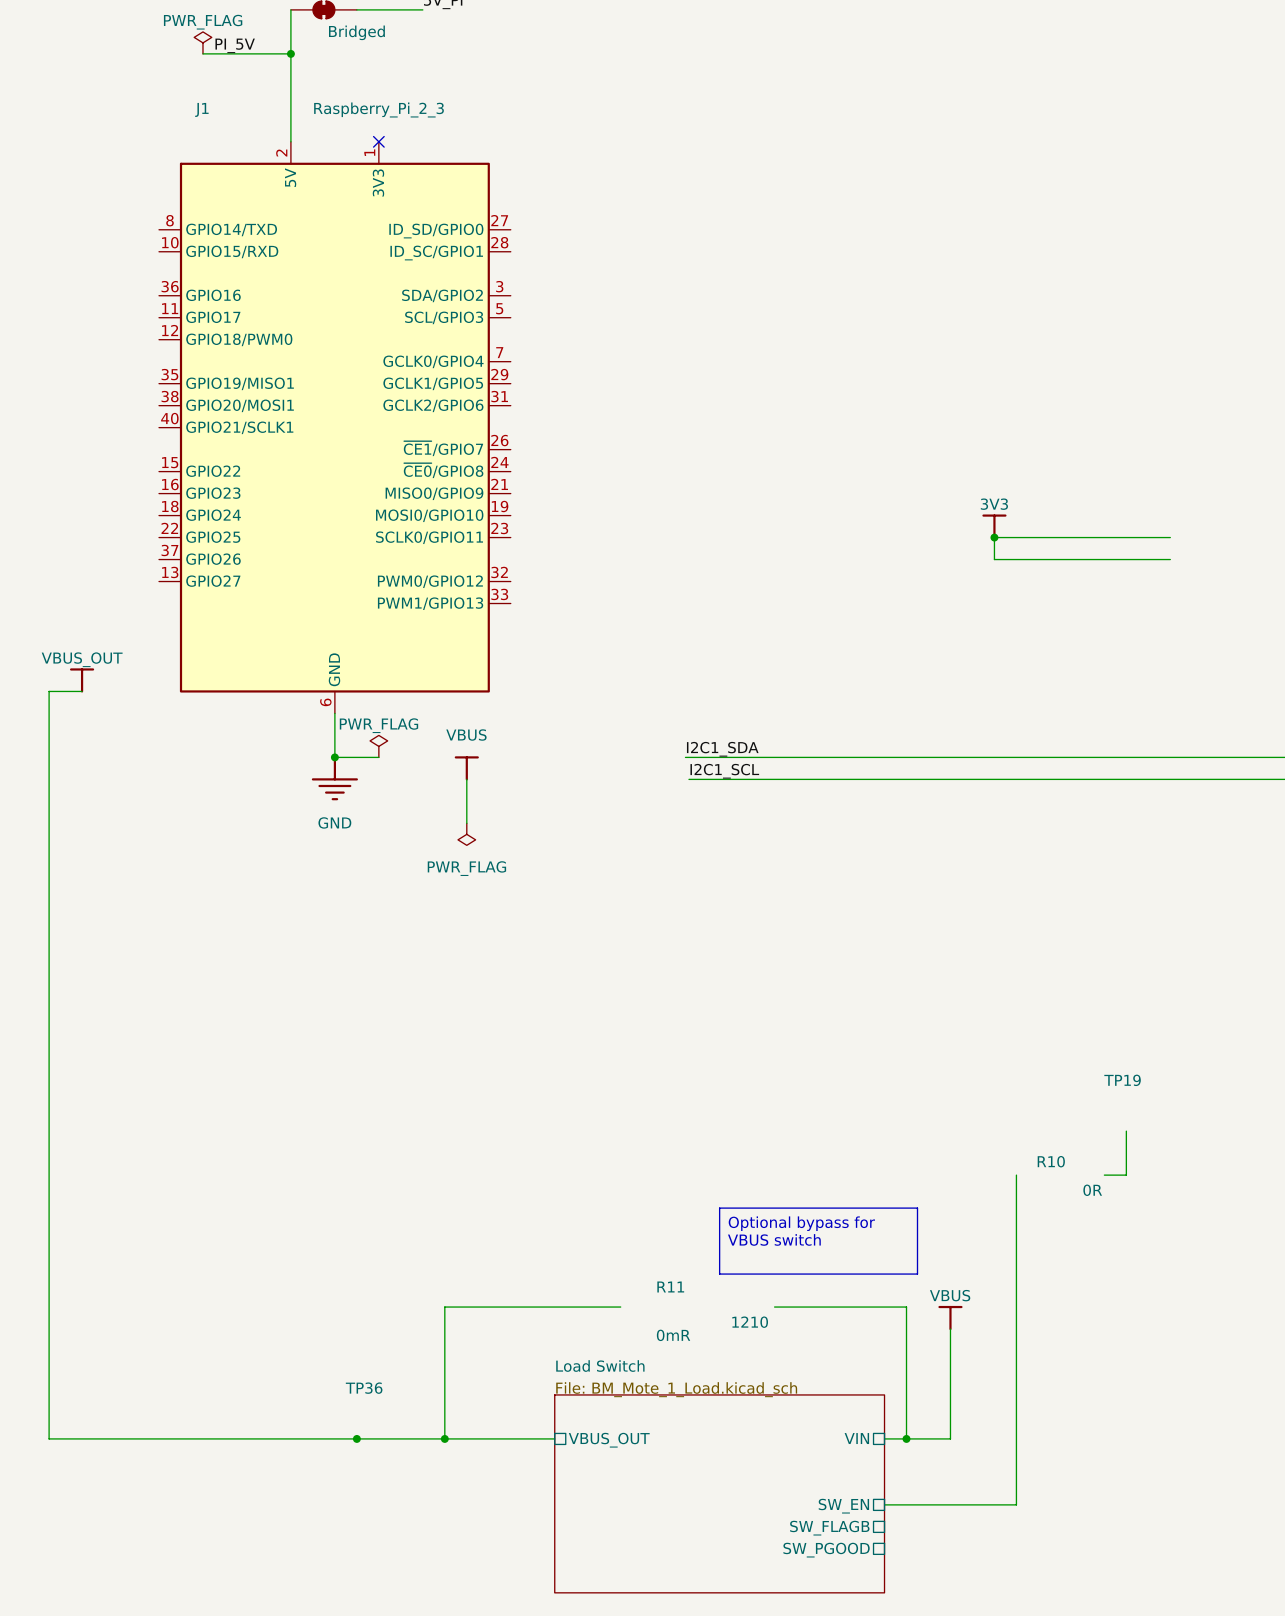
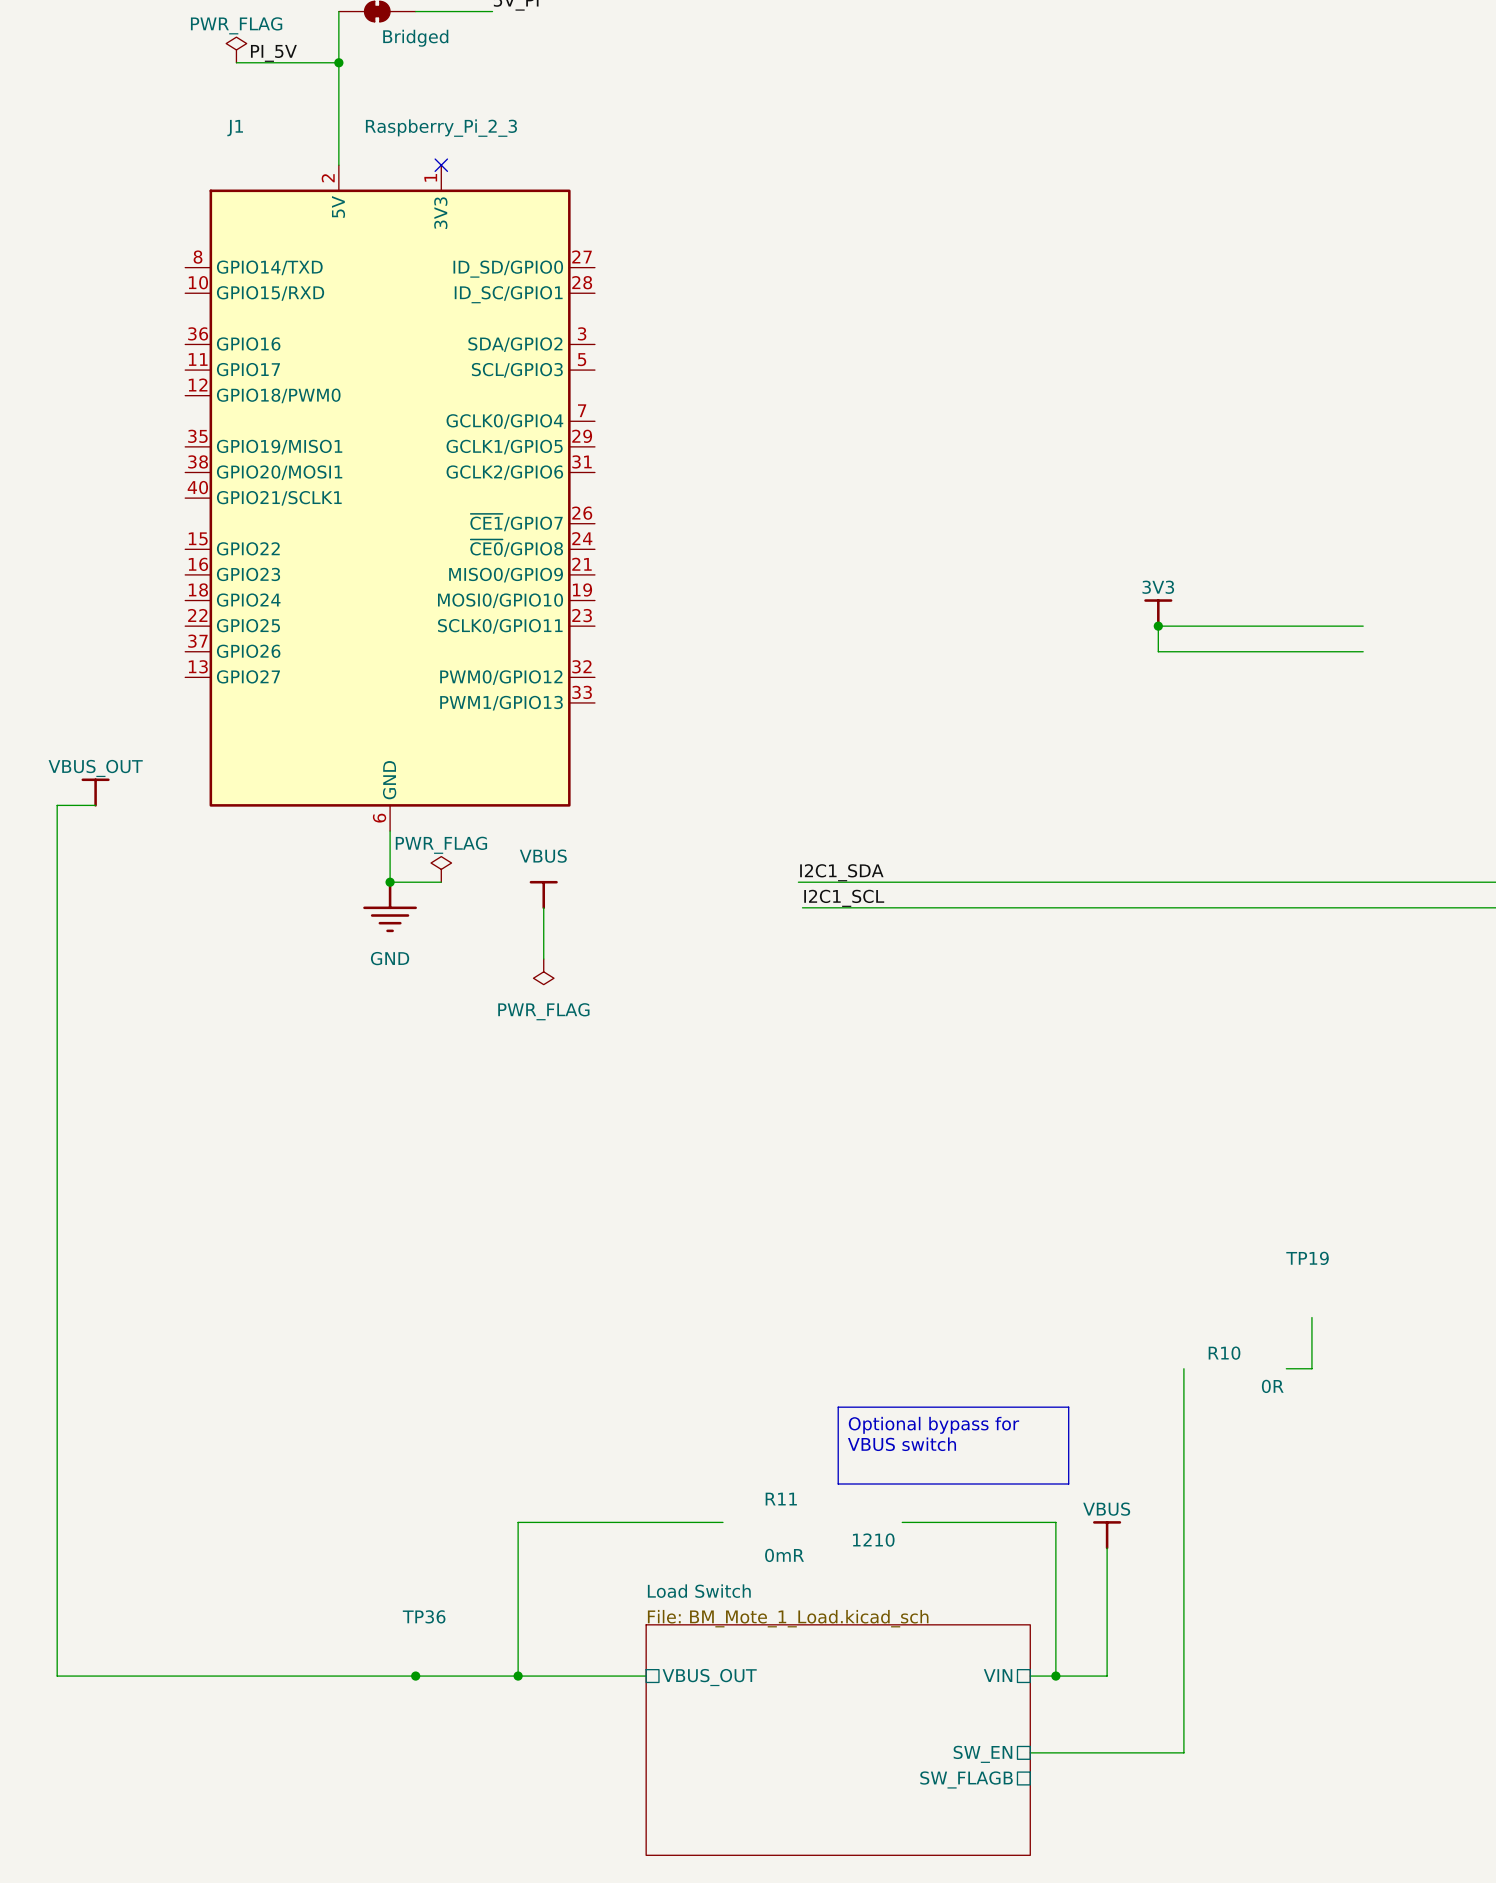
sheet pin: SW_PGOOD (826, 1550) -> none

